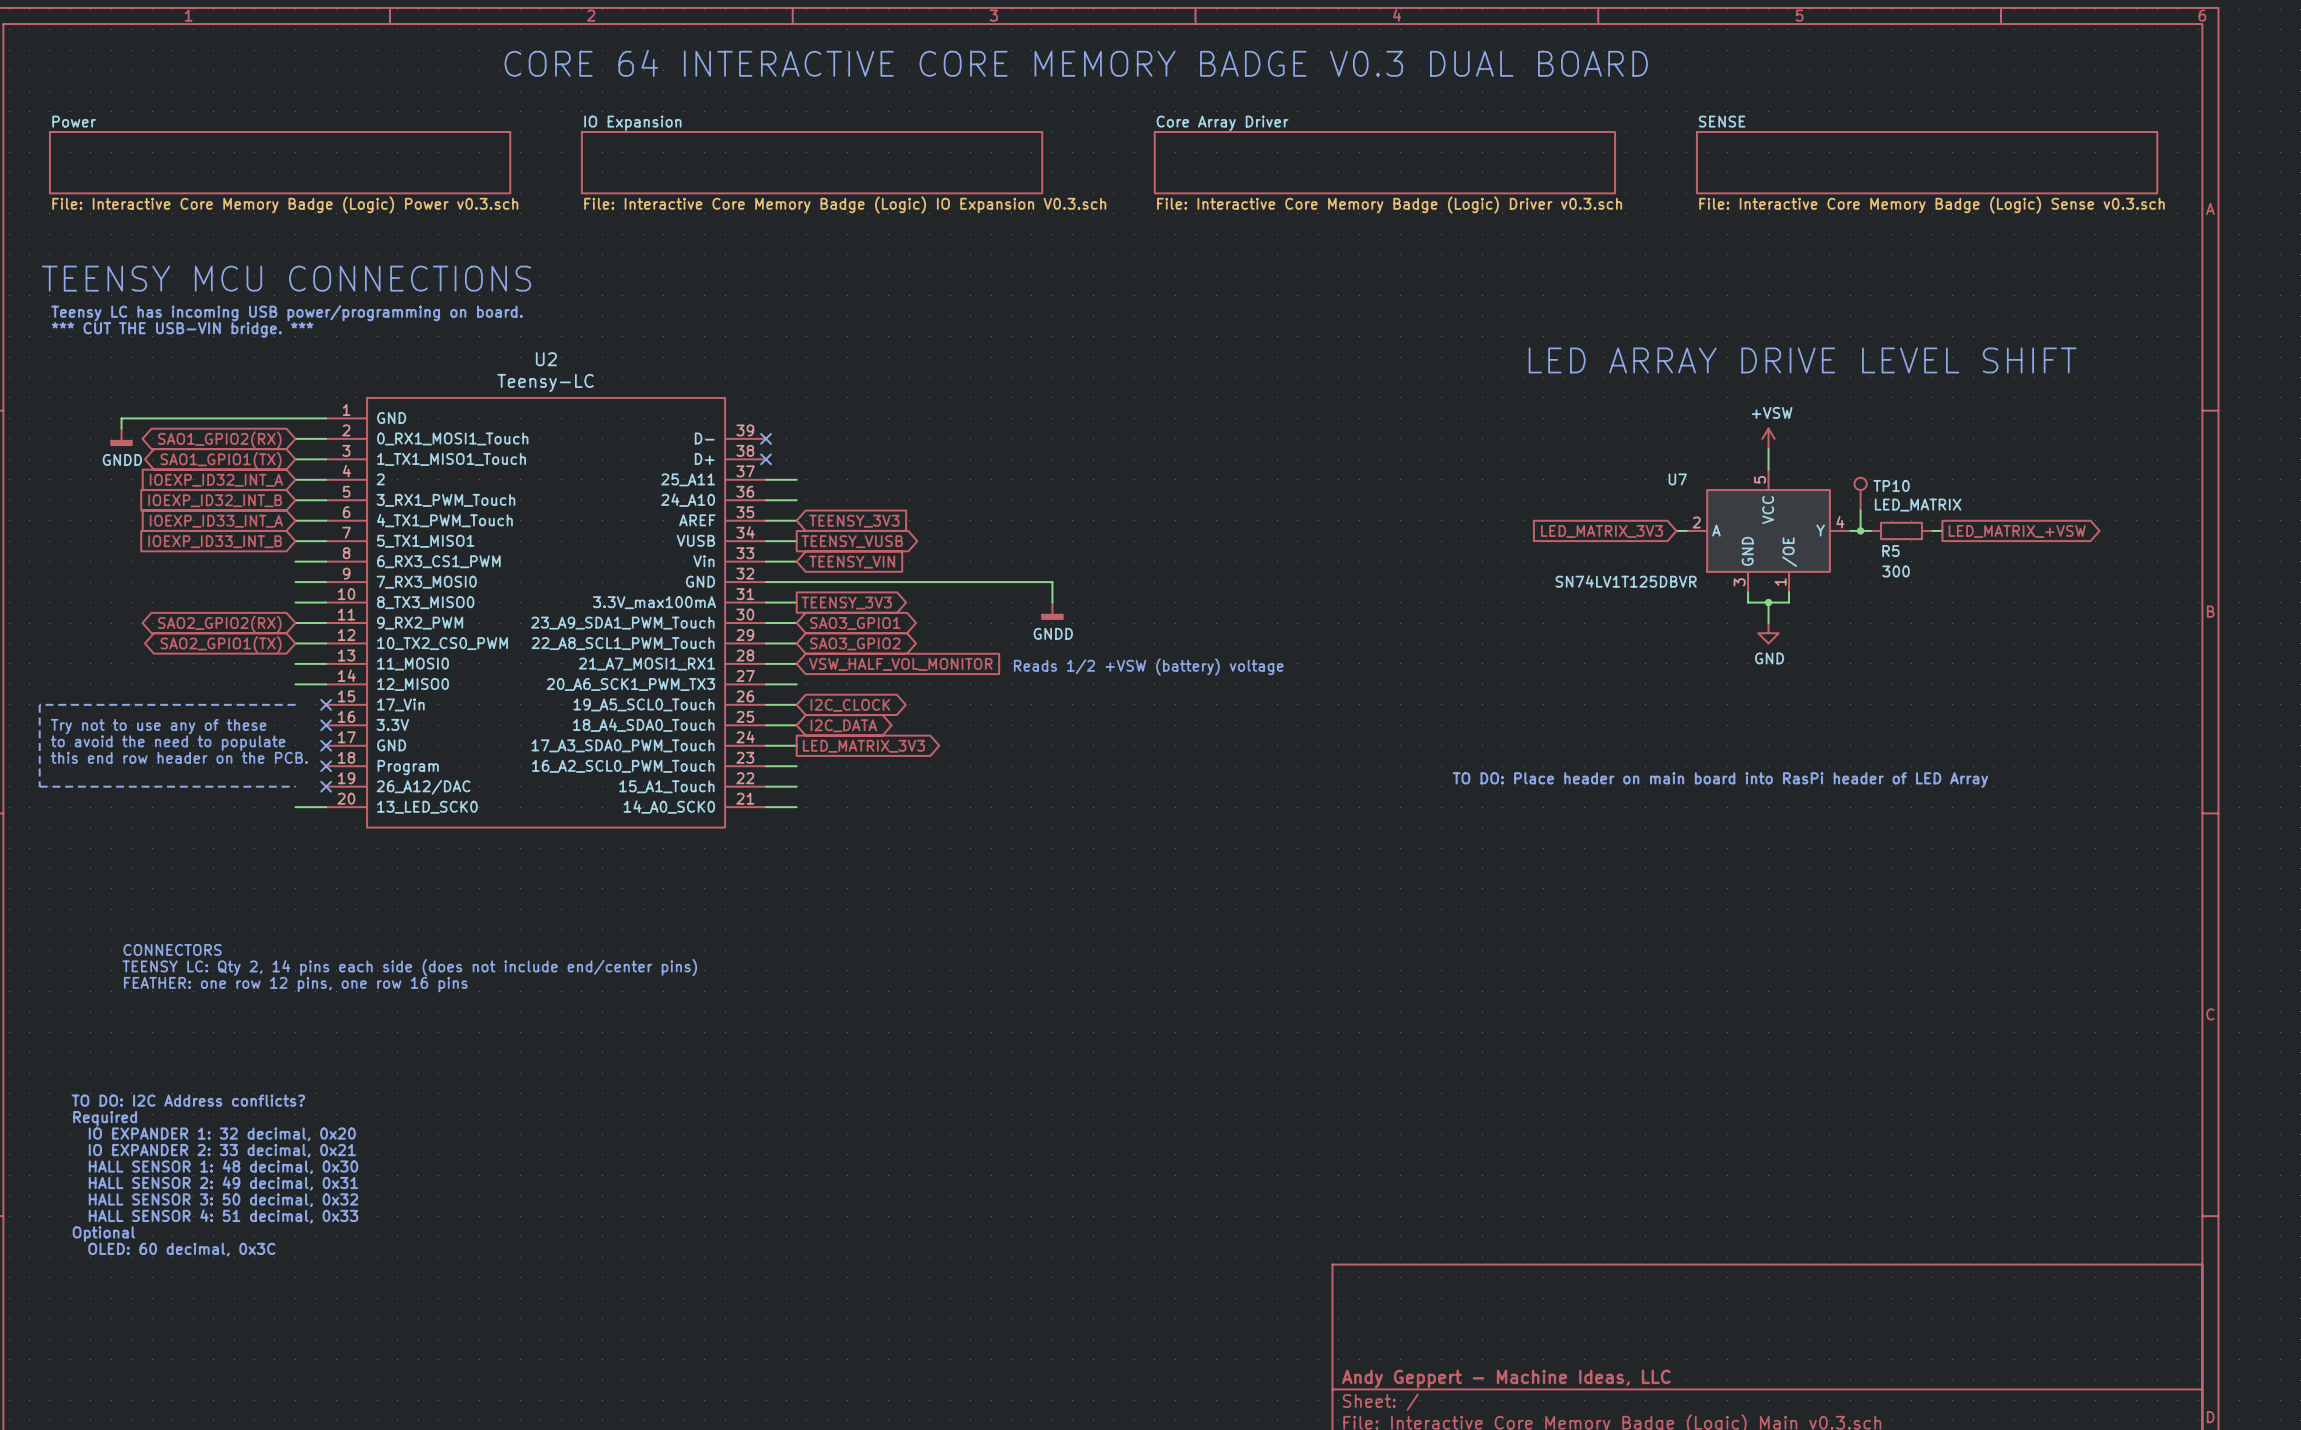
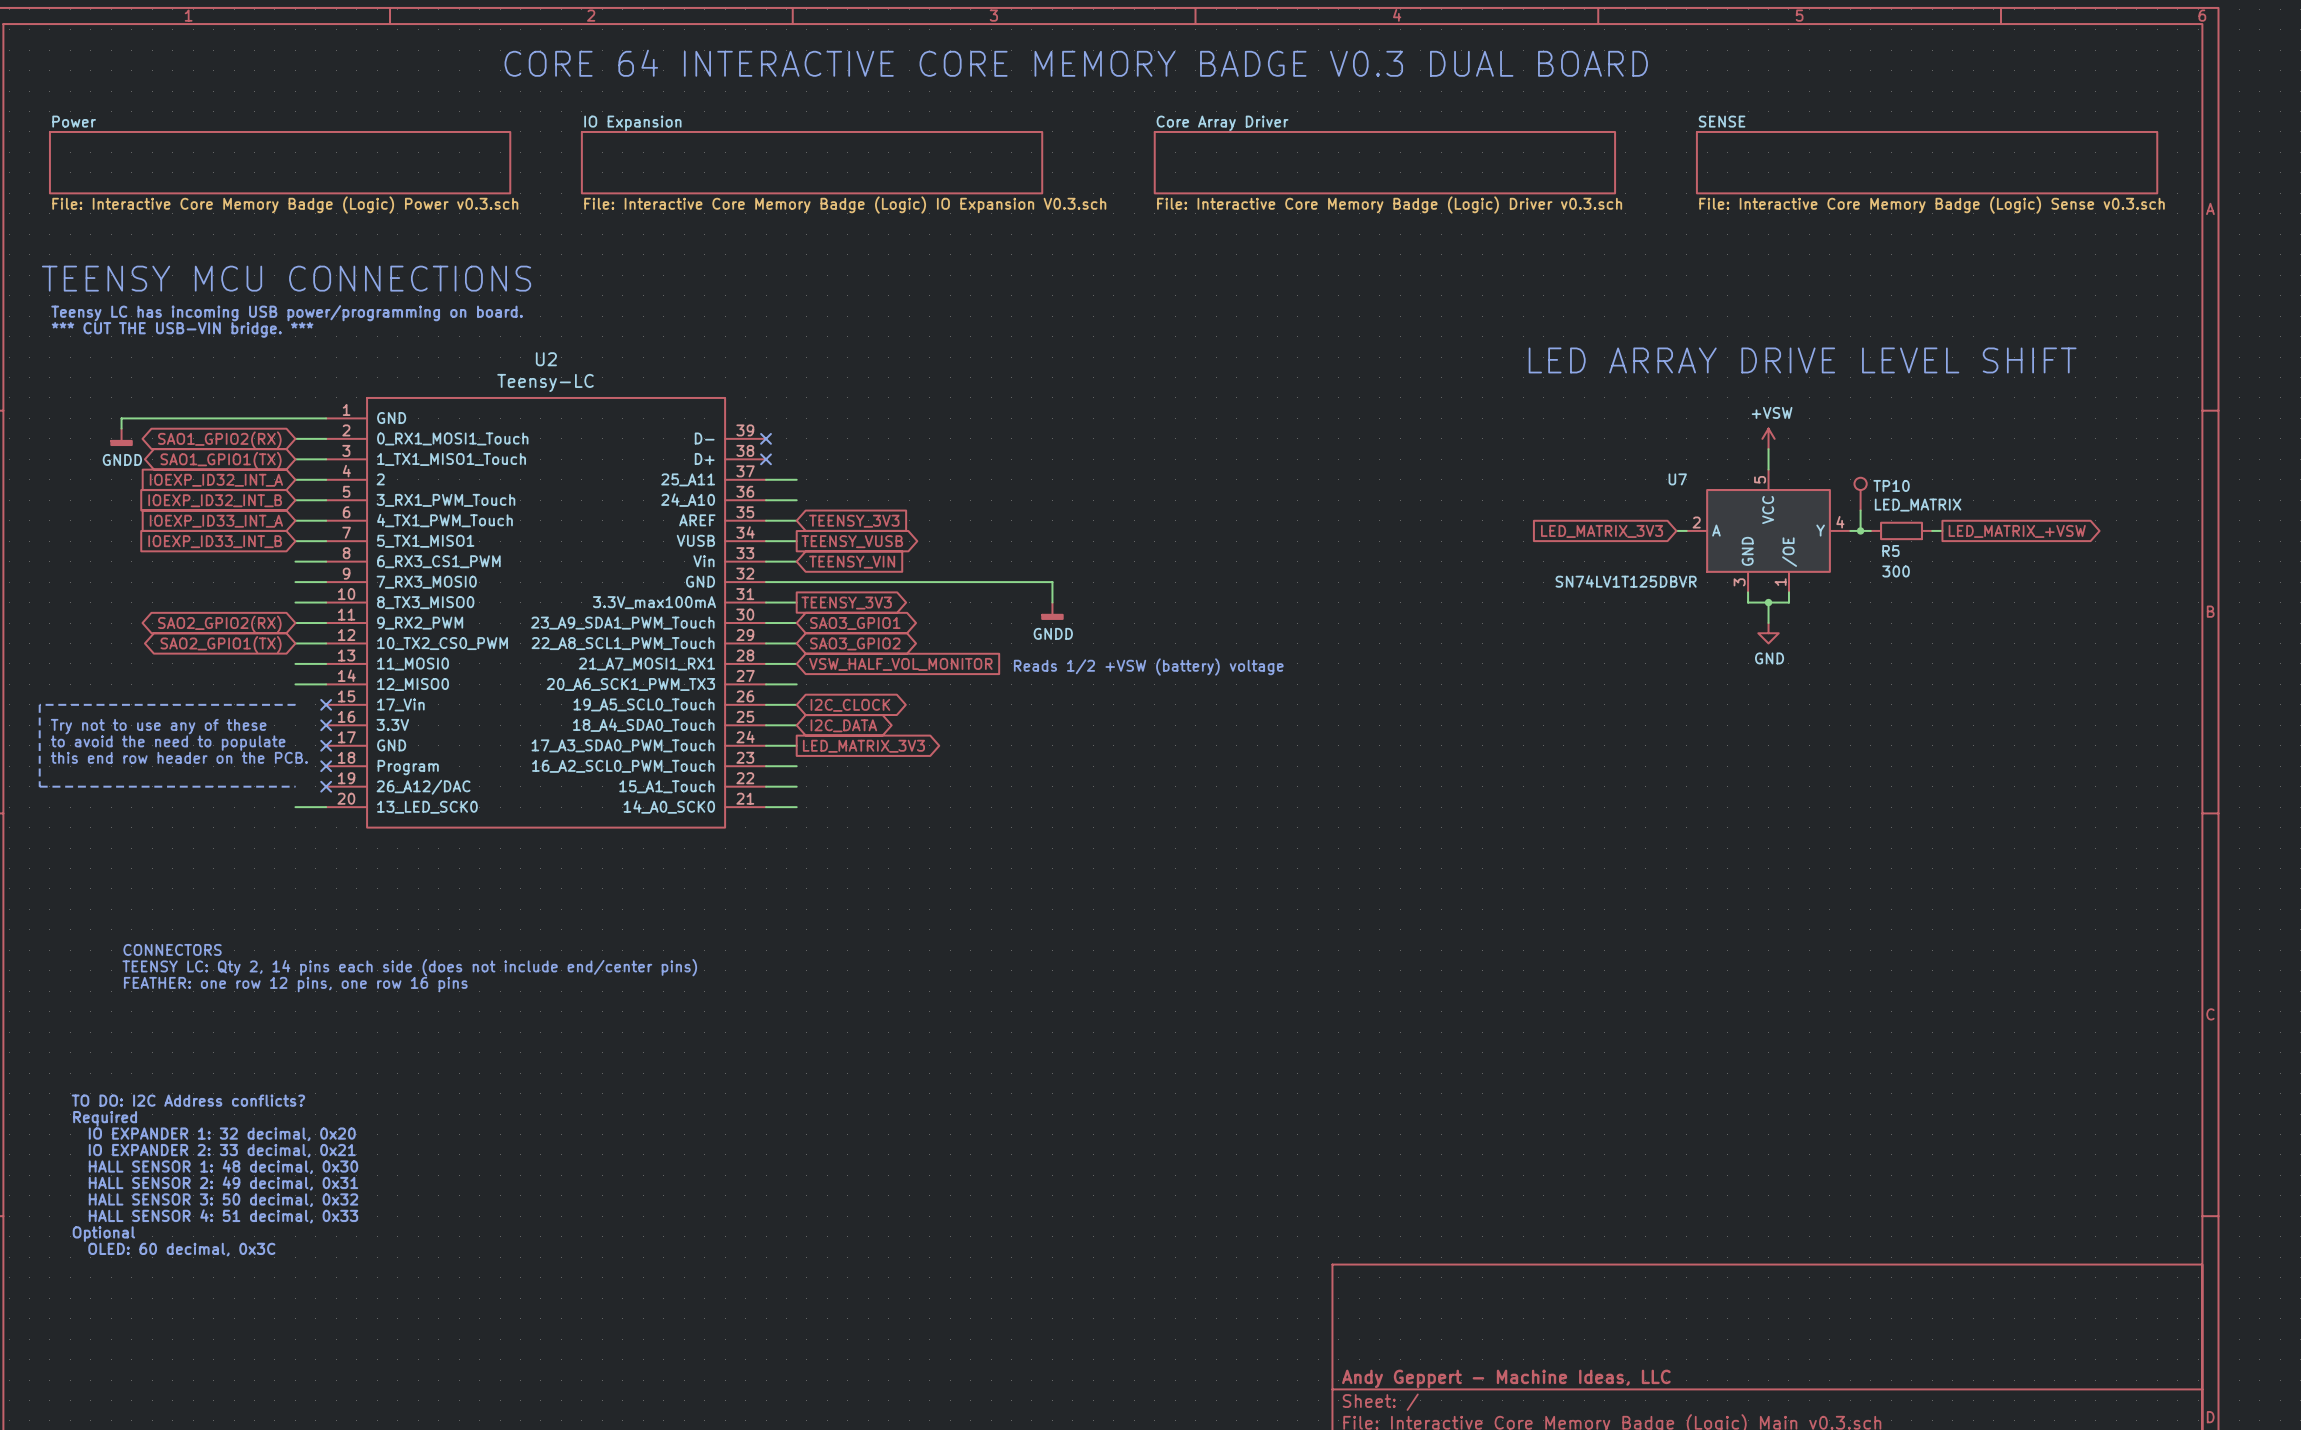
text: TO DO: Place header on main board into RasPi header of LED Array (1720, 780) -> none

